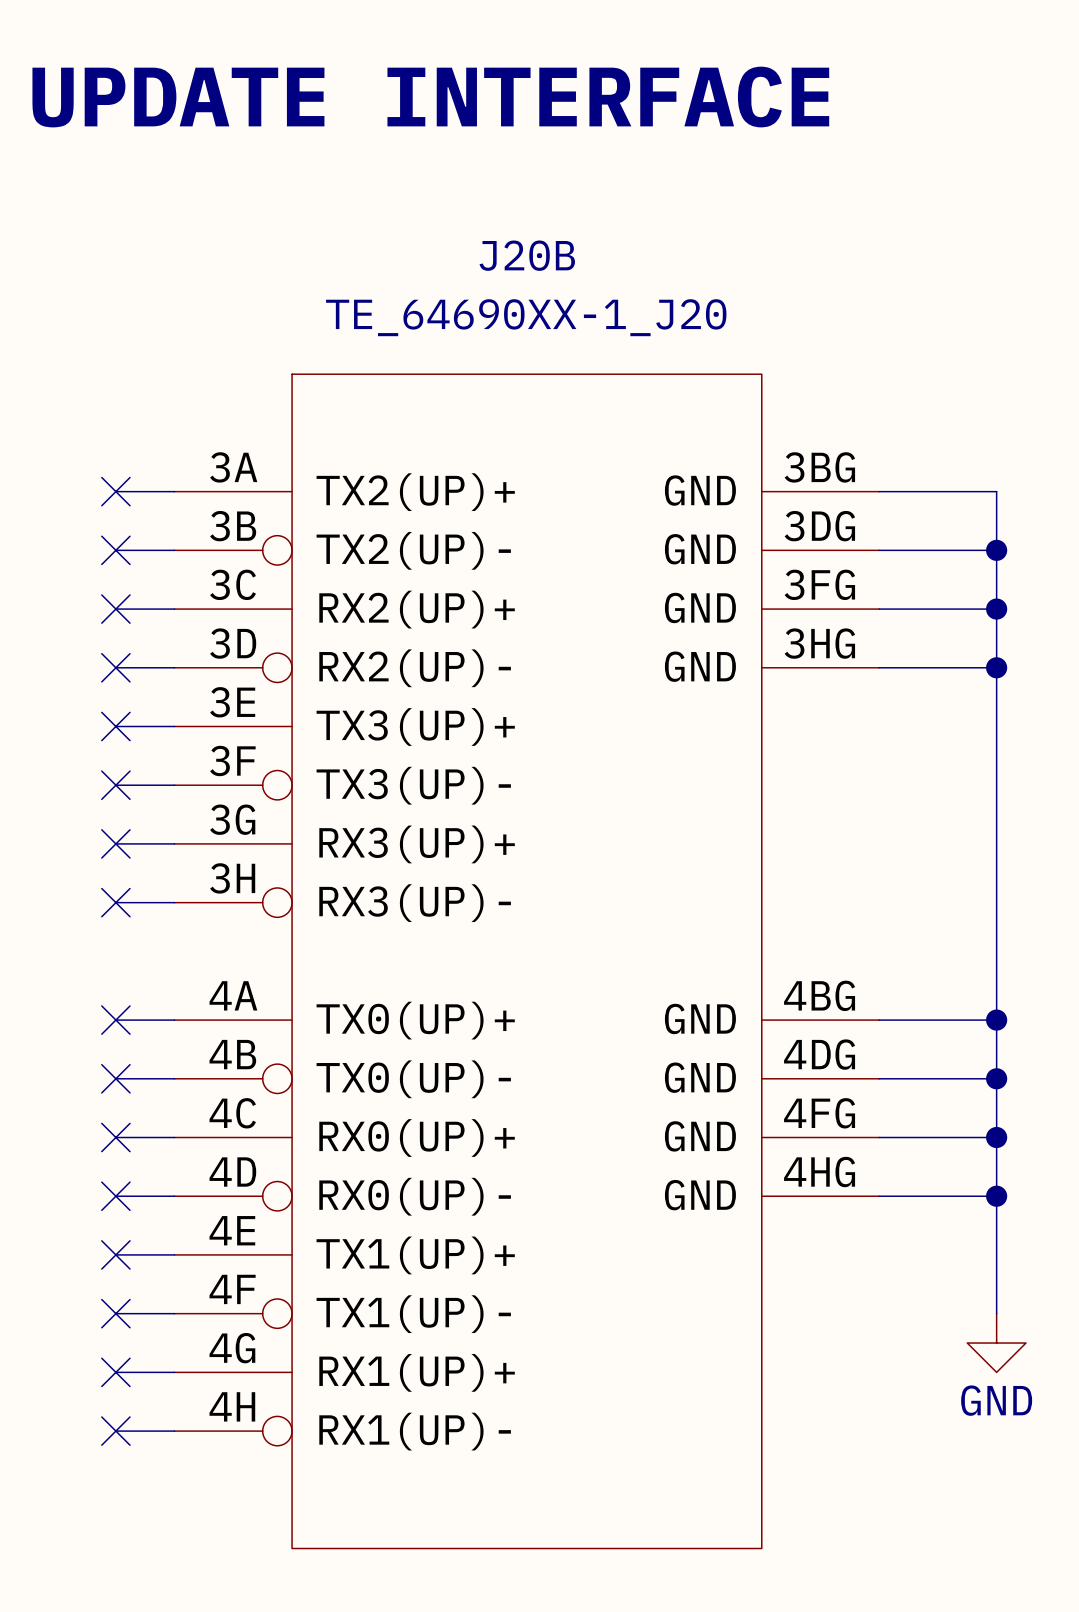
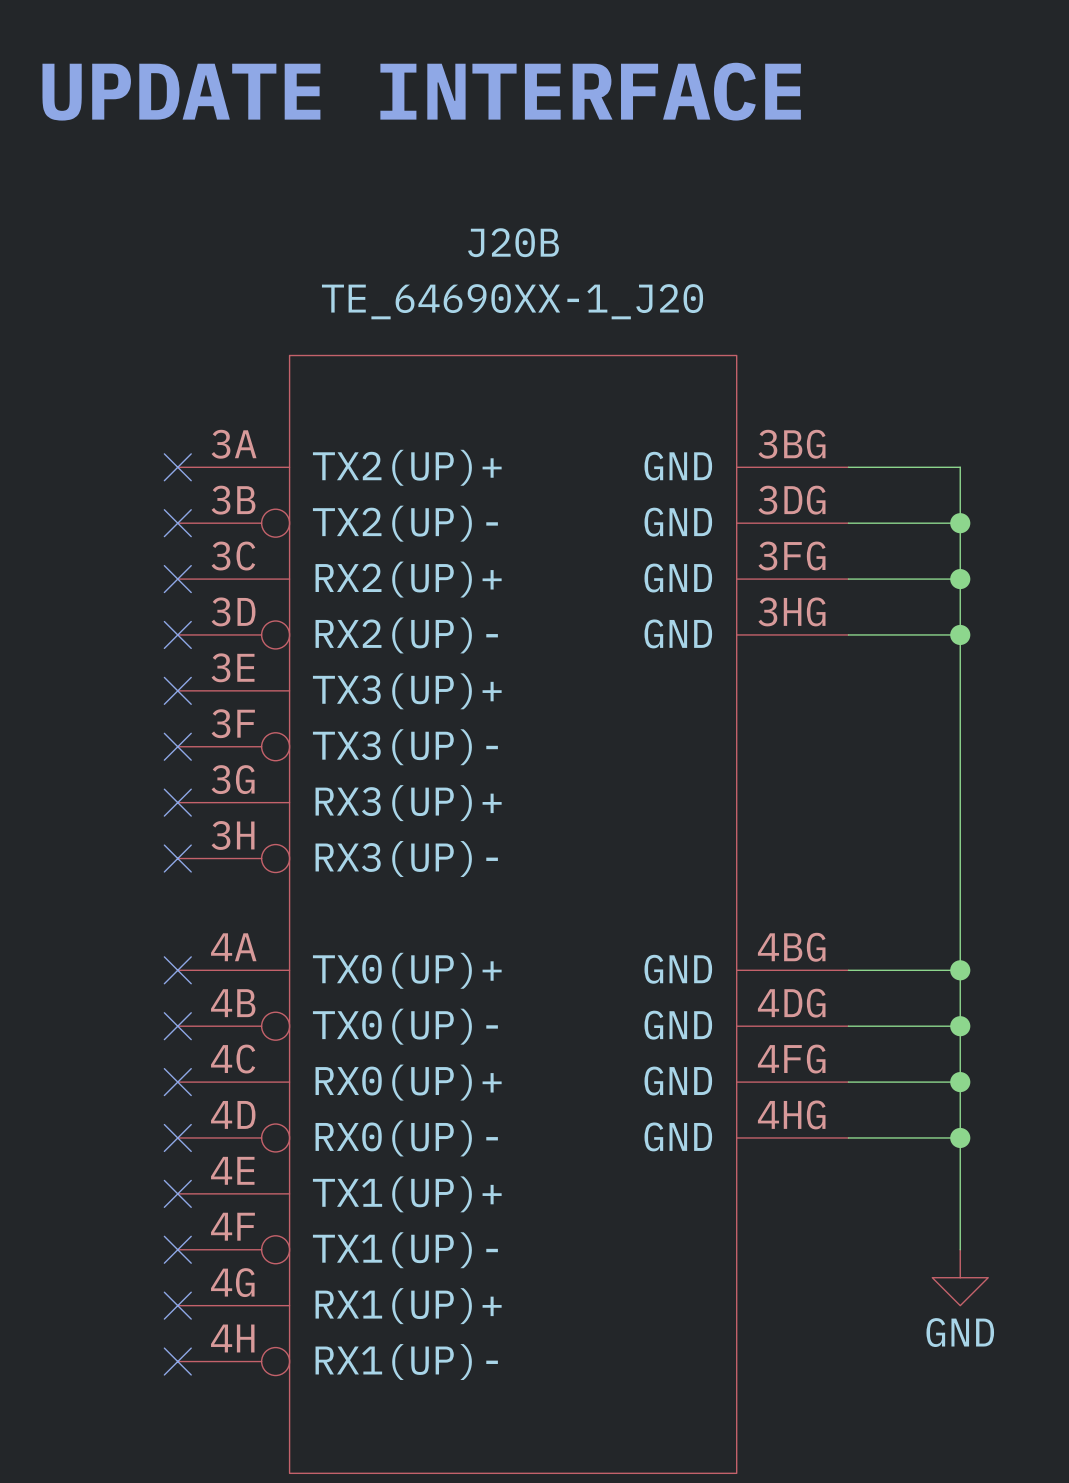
wire: (115, 491) (174, 491) -> none
no-connect mark: (115, 491) -> none
no-connect mark: none -> (177, 467)
wire: (115, 550) (174, 550) -> none
no-connect mark: (115, 550) -> none
no-connect mark: none -> (177, 523)
wire: (115, 609) (174, 609) -> none
no-connect mark: (115, 609) -> none
no-connect mark: none -> (177, 579)
wire: (115, 667) (174, 667) -> none
no-connect mark: (115, 667) -> none
no-connect mark: none -> (177, 634)
wire: (115, 726) (174, 726) -> none
no-connect mark: (115, 726) -> none
no-connect mark: none -> (177, 690)
wire: (115, 785) (174, 785) -> none
no-connect mark: (115, 785) -> none
no-connect mark: none -> (177, 746)
wire: (115, 843) (174, 843) -> none
no-connect mark: (115, 843) -> none
no-connect mark: none -> (177, 802)
wire: (115, 902) (174, 902) -> none
no-connect mark: (115, 902) -> none
no-connect mark: none -> (177, 858)
wire: (115, 1020) (174, 1020) -> none
no-connect mark: (115, 1020) -> none
no-connect mark: none -> (177, 970)
wire: (115, 1078) (174, 1078) -> none
no-connect mark: (115, 1078) -> none
no-connect mark: none -> (177, 1026)
wire: (115, 1137) (174, 1137) -> none
no-connect mark: (115, 1137) -> none
no-connect mark: none -> (177, 1082)
wire: (115, 1196) (174, 1196) -> none
no-connect mark: (115, 1196) -> none
no-connect mark: none -> (177, 1137)
wire: (115, 1254) (174, 1254) -> none
no-connect mark: (115, 1254) -> none
no-connect mark: none -> (177, 1193)
wire: (115, 1313) (174, 1313) -> none
no-connect mark: (115, 1313) -> none
no-connect mark: none -> (177, 1249)
wire: (115, 1372) (174, 1372) -> none
no-connect mark: (115, 1372) -> none
no-connect mark: none -> (177, 1305)
wire: (115, 1431) (174, 1431) -> none
no-connect mark: (115, 1431) -> none
no-connect mark: none -> (177, 1361)

